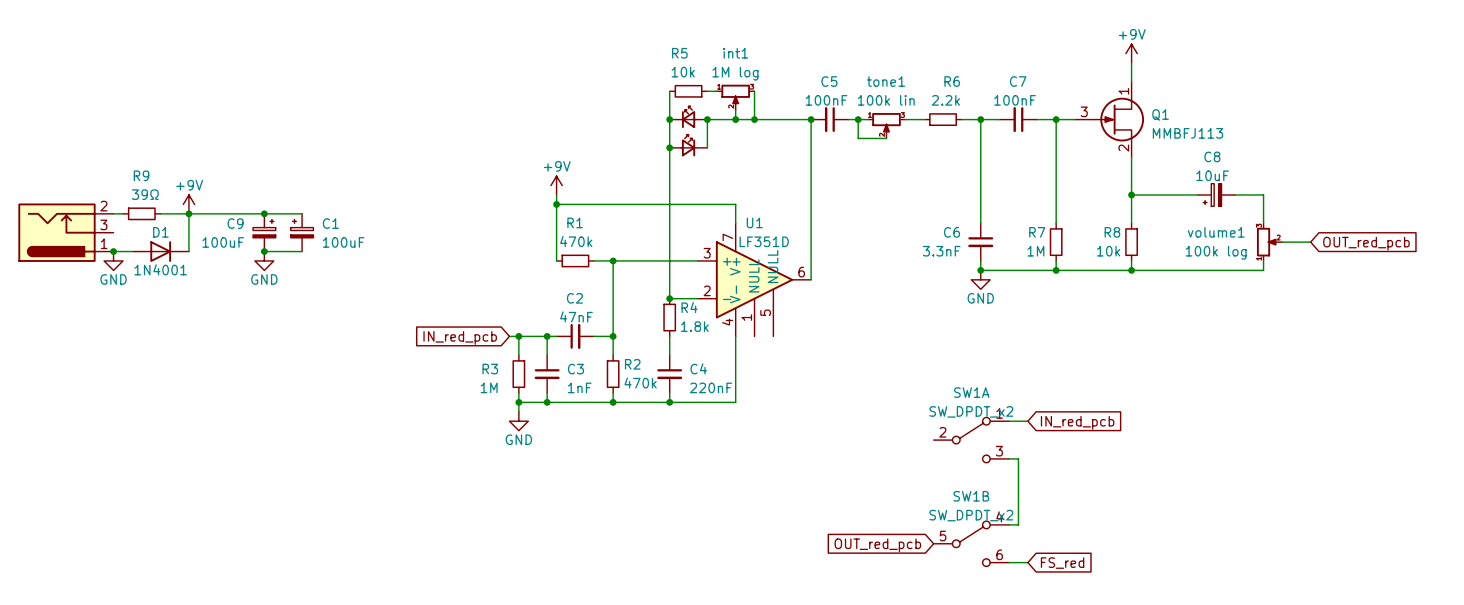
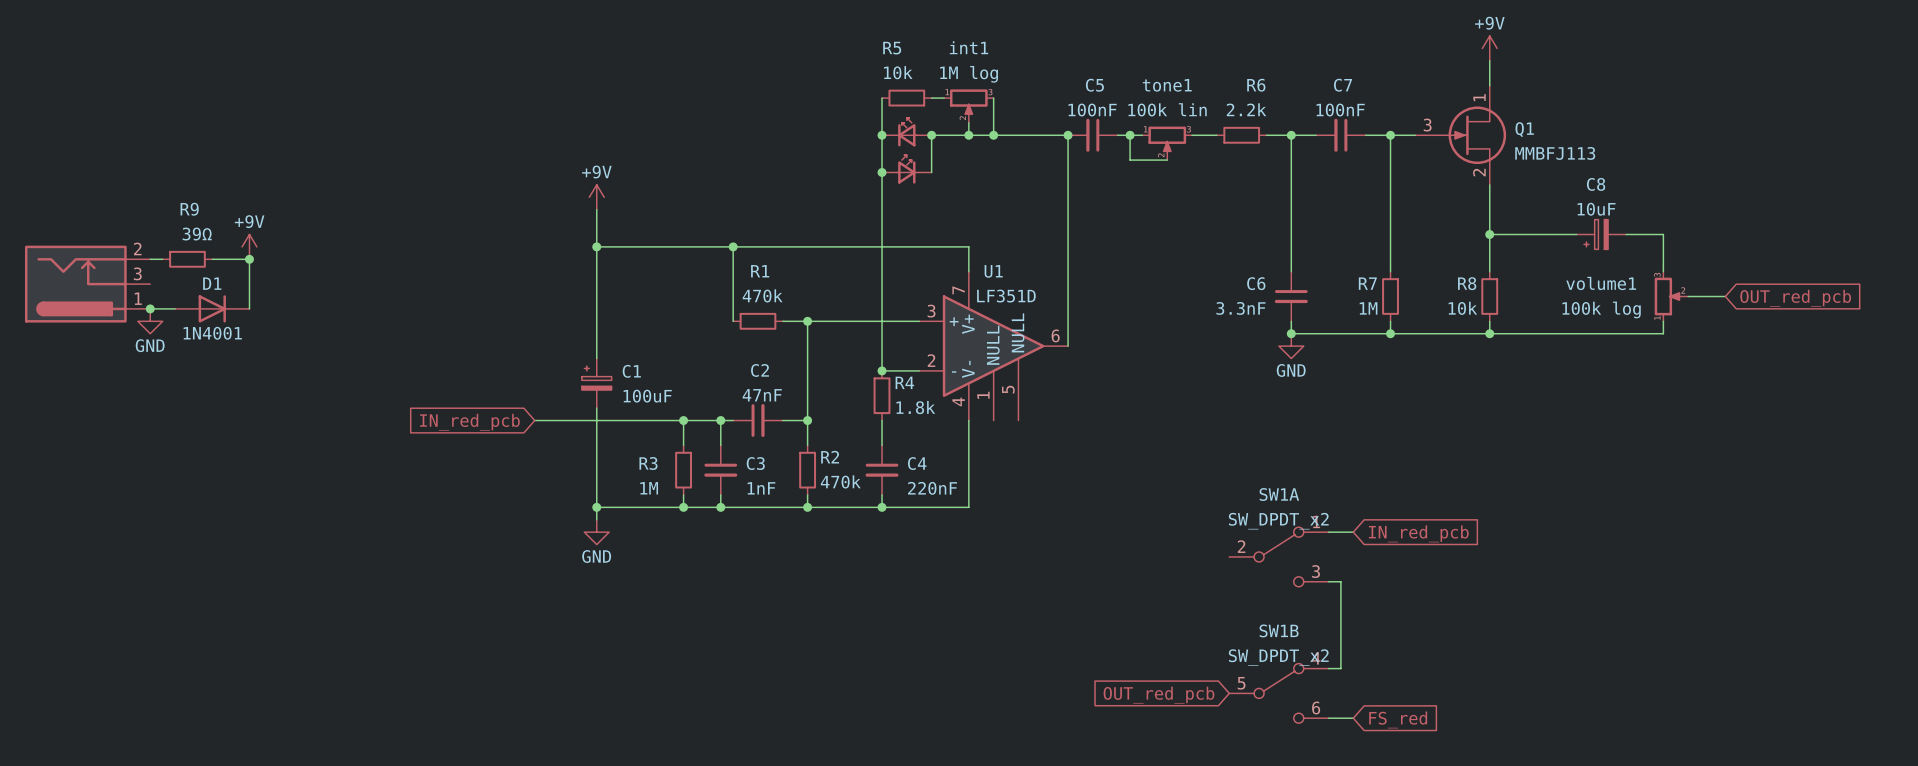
wire: none -> (596, 209) (596, 358)
power symbol position: +9V (556, 185) -> +9V (596, 197)
wire: (556, 194) (556, 204) -> (596, 246) (733, 246)
junction: none -> (596, 246)
wire: (188, 213) (302, 213) -> none
junction: (264, 213) -> none
C9: 100uF (264, 232) -> none
C1 position: (302, 232) -> (596, 383)
wire: (264, 251) (302, 251) -> none
junction: (264, 251) -> none
power symbol: GND (264, 260) -> none
wire: none -> (596, 408) (596, 519)
wire: none -> (534, 420) (671, 420)
global label position: IN_red_pcb (460, 337) -> IN_red_pcb (469, 422)
junction: none -> (596, 507)
wire: (518, 402) (518, 411) -> (683, 507) (596, 507)
power symbol position: GND (518, 421) -> GND (596, 532)

